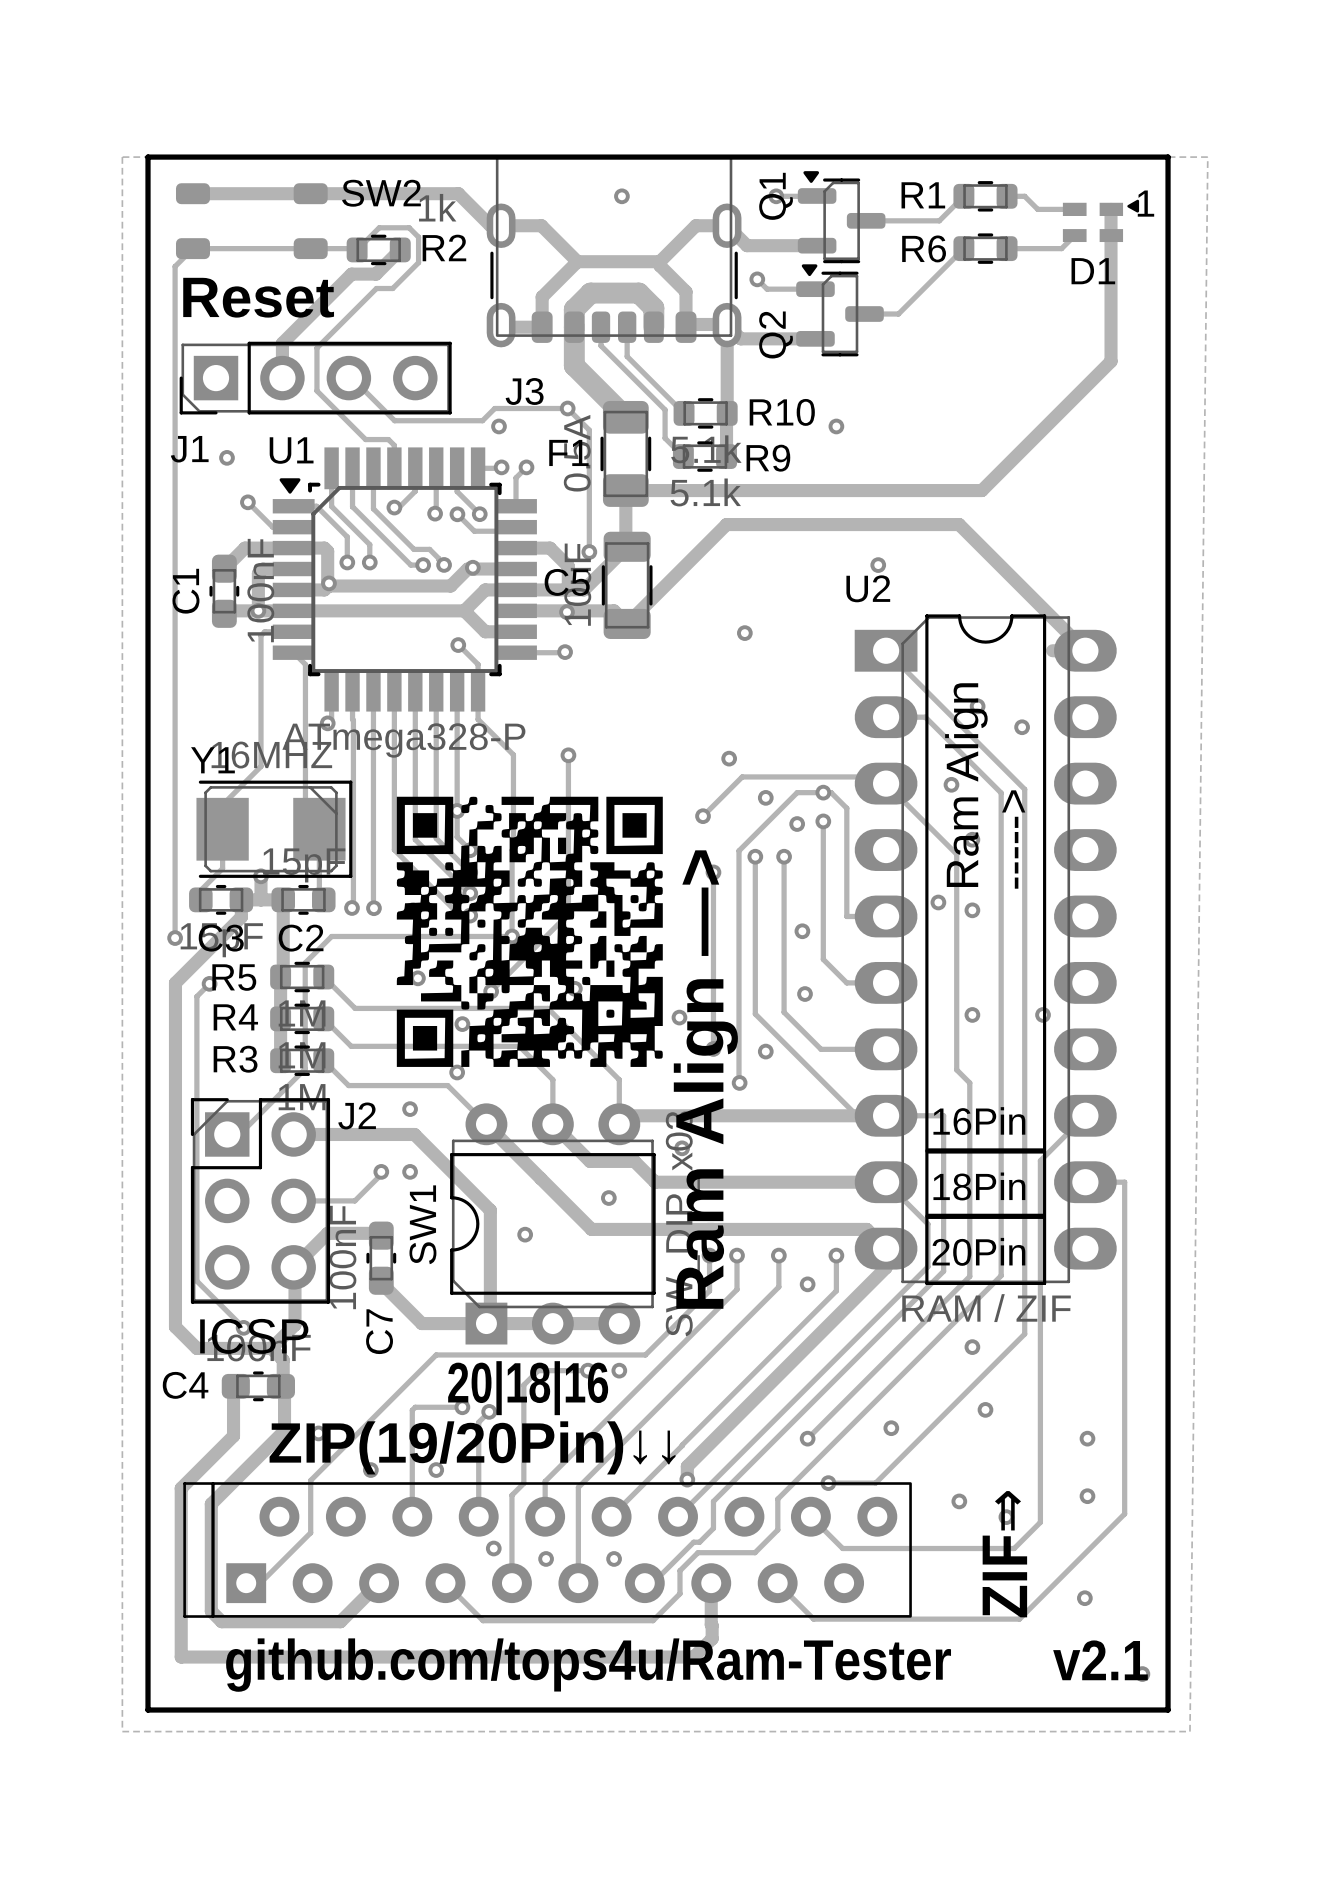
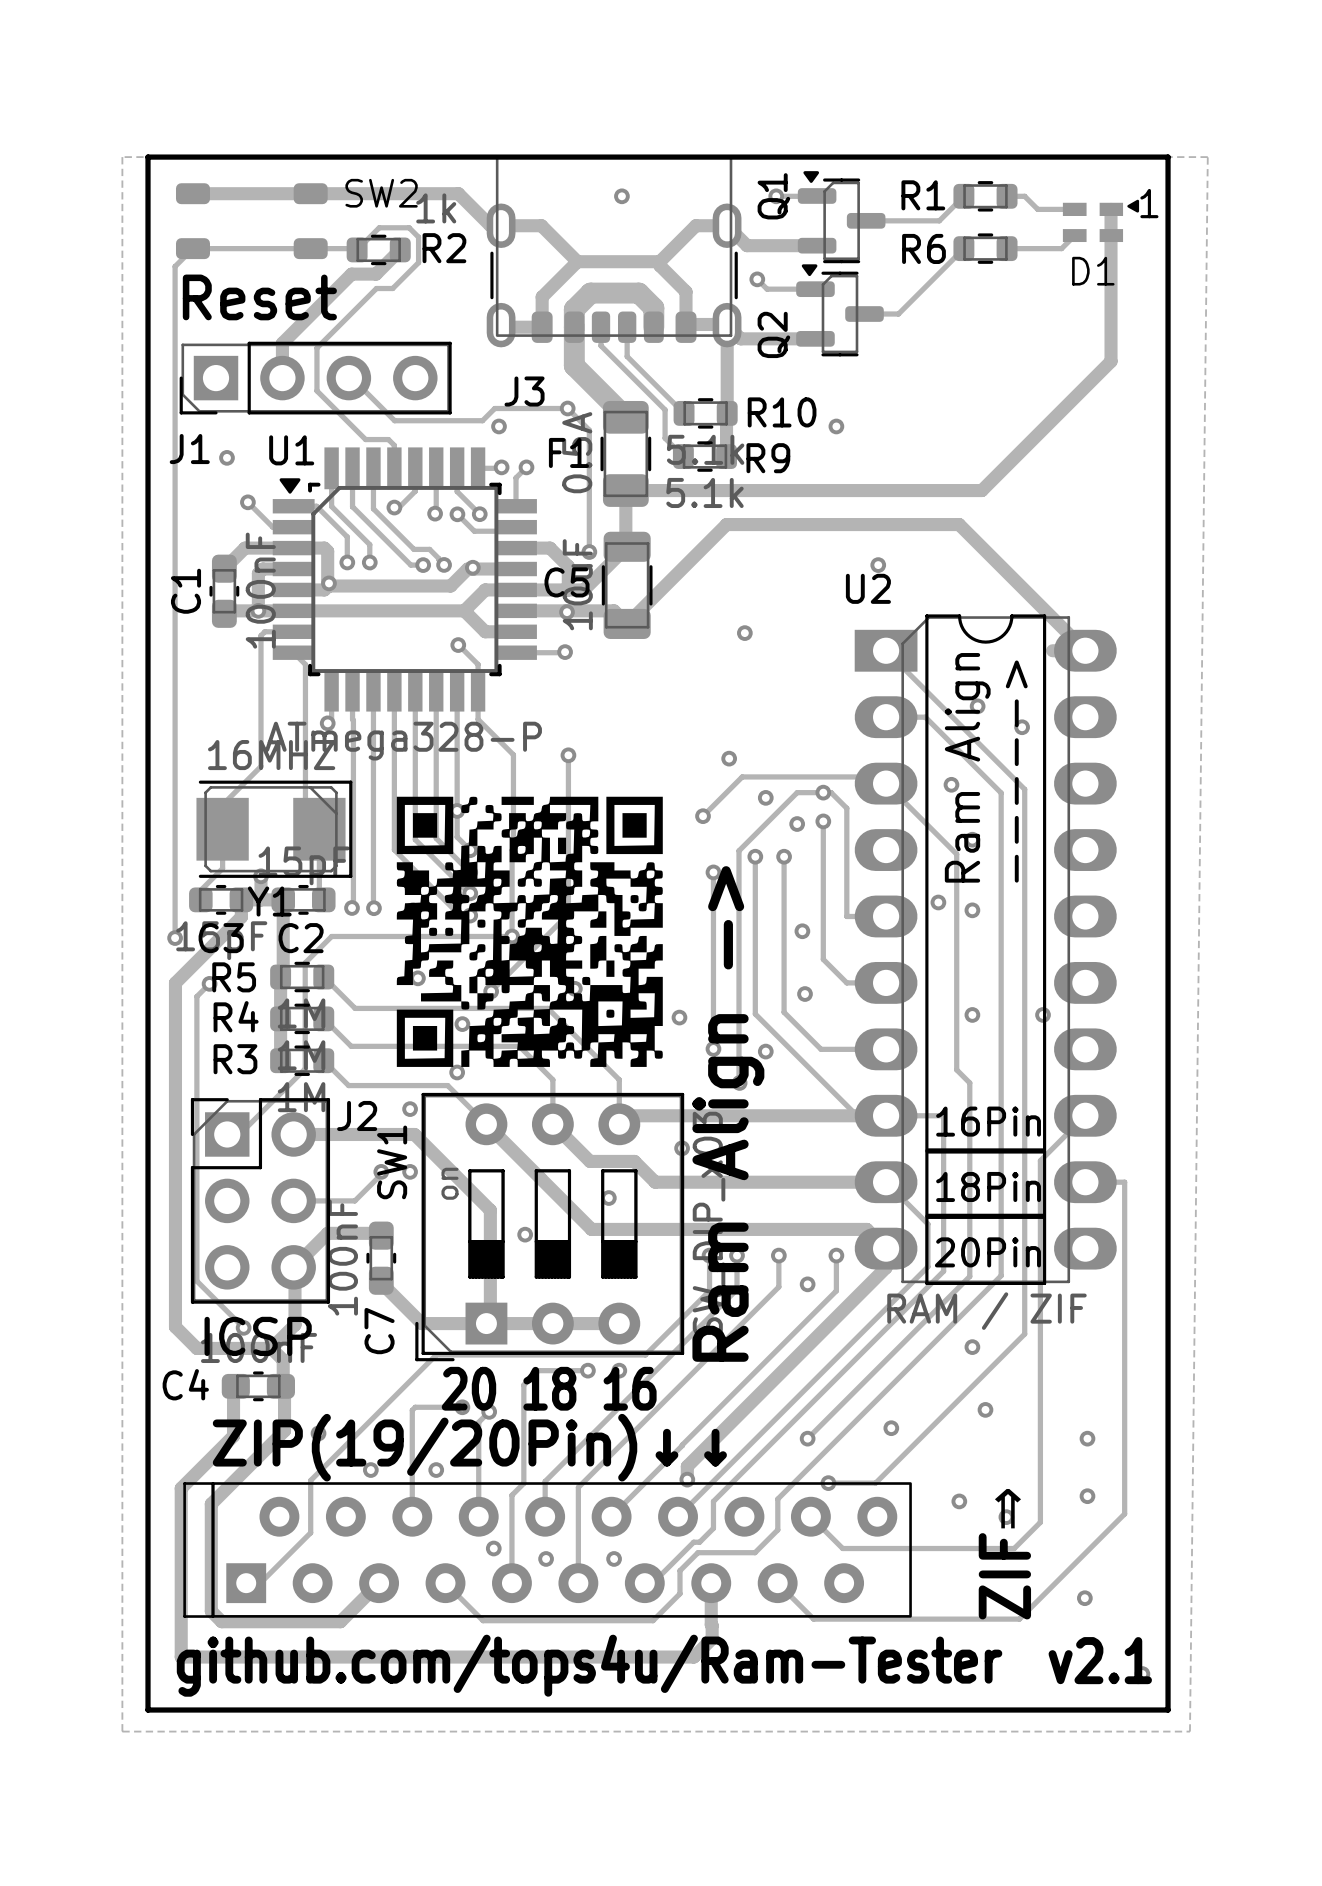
Y1 name position: Y1 (212, 760) -> Y1 (269, 901)
text position: Ram Align —> (705, 1079) -> Ram Align —> (728, 1113)
SW1 footprint: [450, 1103, 656, 1345] -> [415, 1092, 685, 1362]
SW1 name position: SW1 (422, 1224) -> SW1 (392, 1162)
text: 20|18|16 (528, 1388) -> 20 18 16 (549, 1388)

